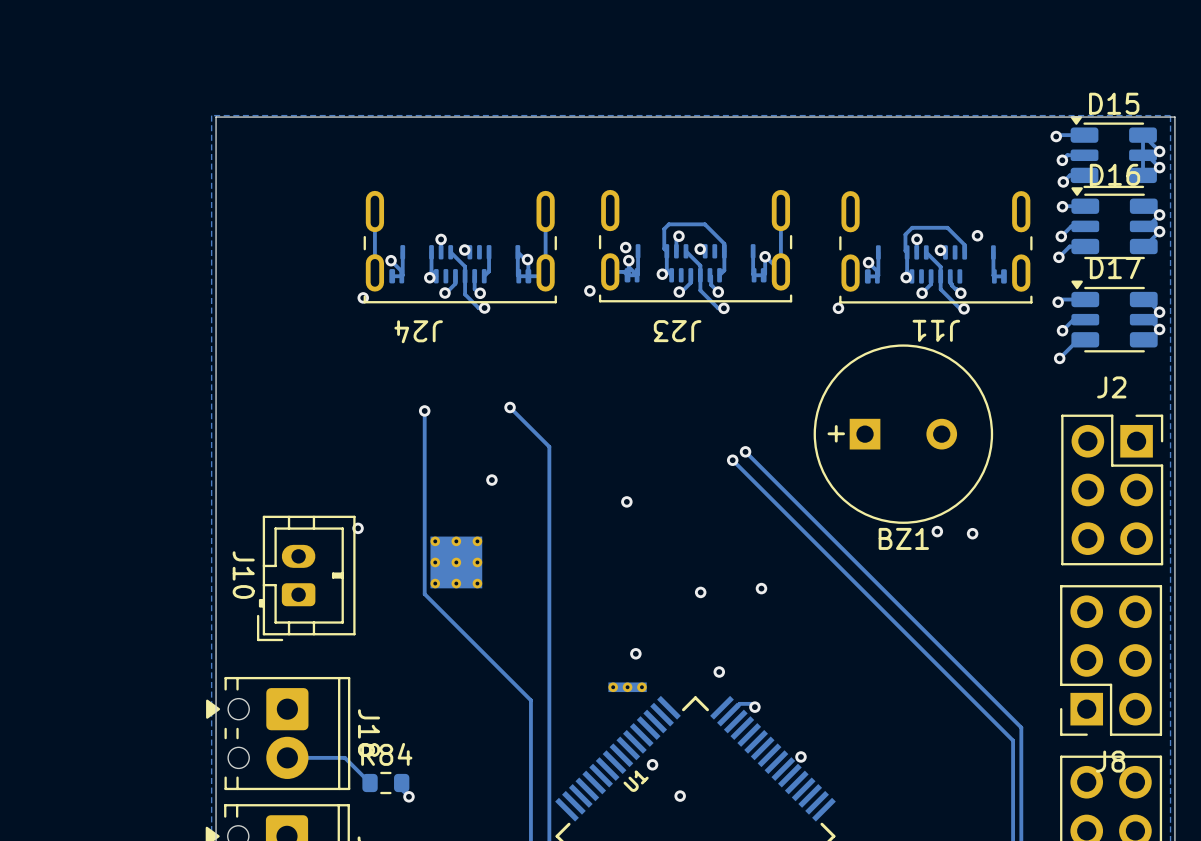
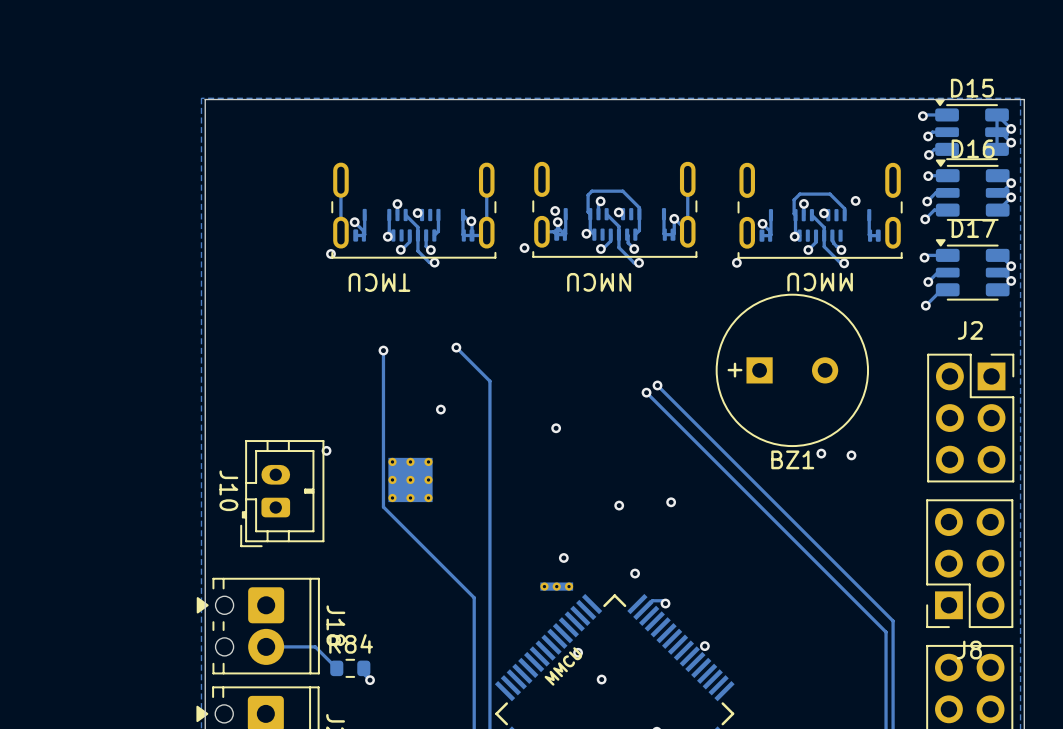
J11 name: J11 (936, 330) -> MMCU (820, 282)
J24 name: J24 (418, 331) -> TMCU (379, 282)
J23 name: J23 (677, 331) -> NMCU (599, 282)
U1 name: U1 (636, 781) -> MMCU (563, 666)

